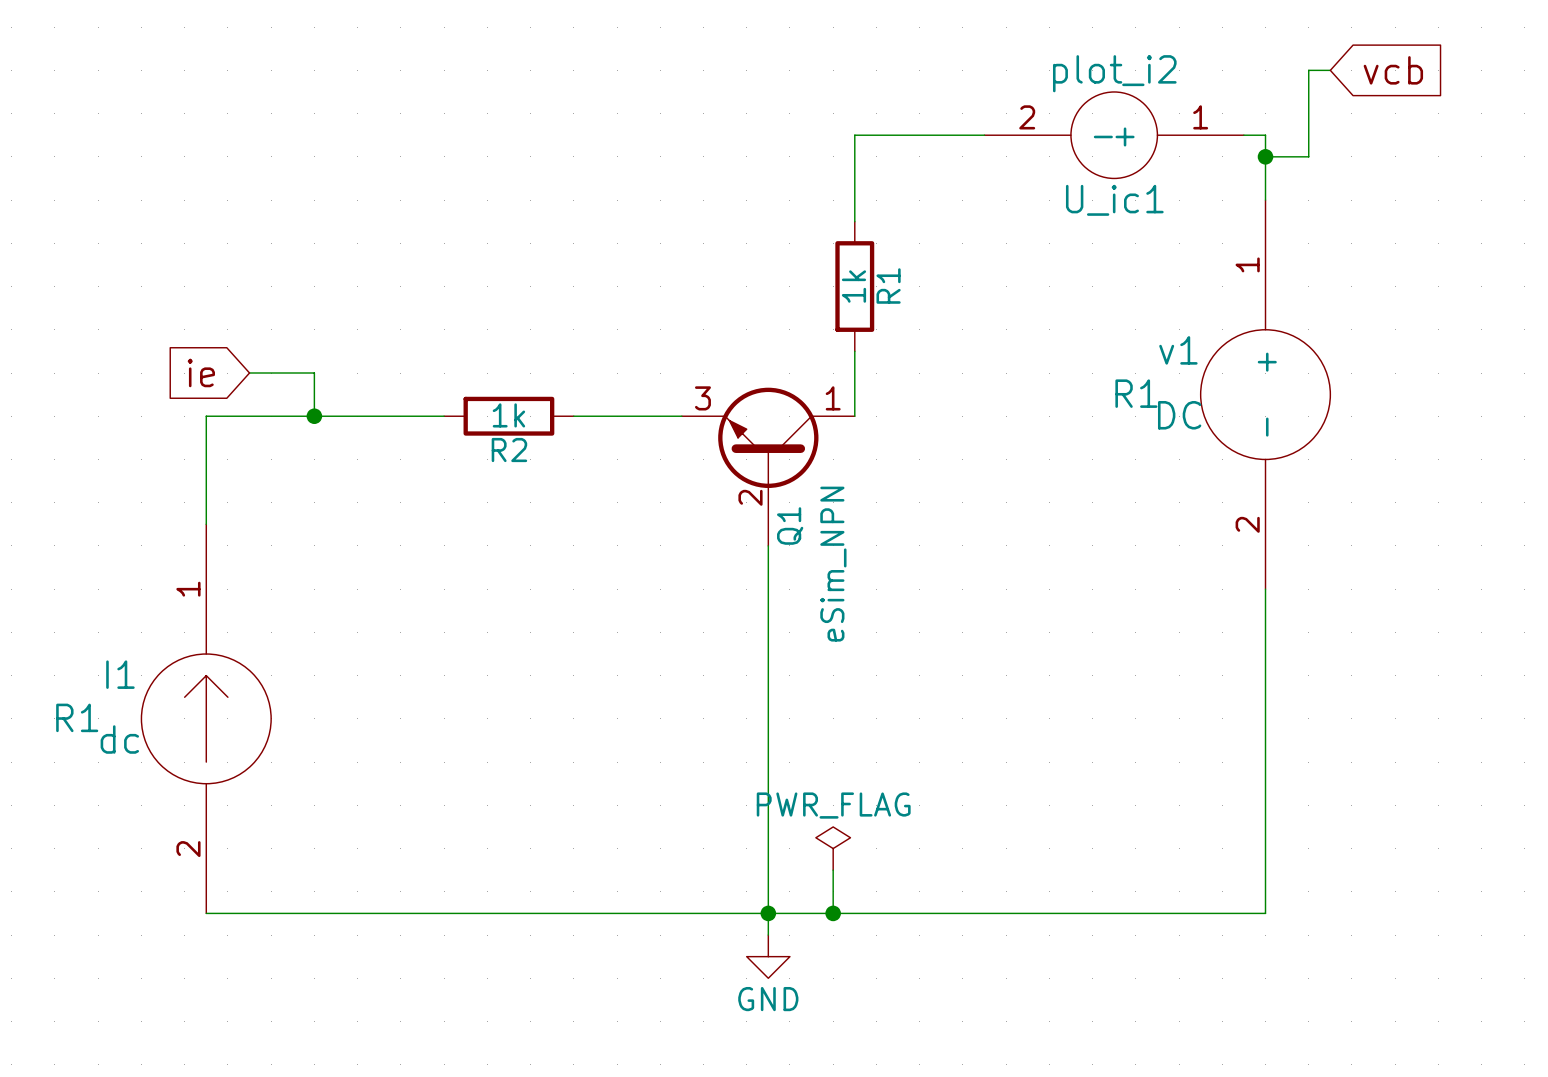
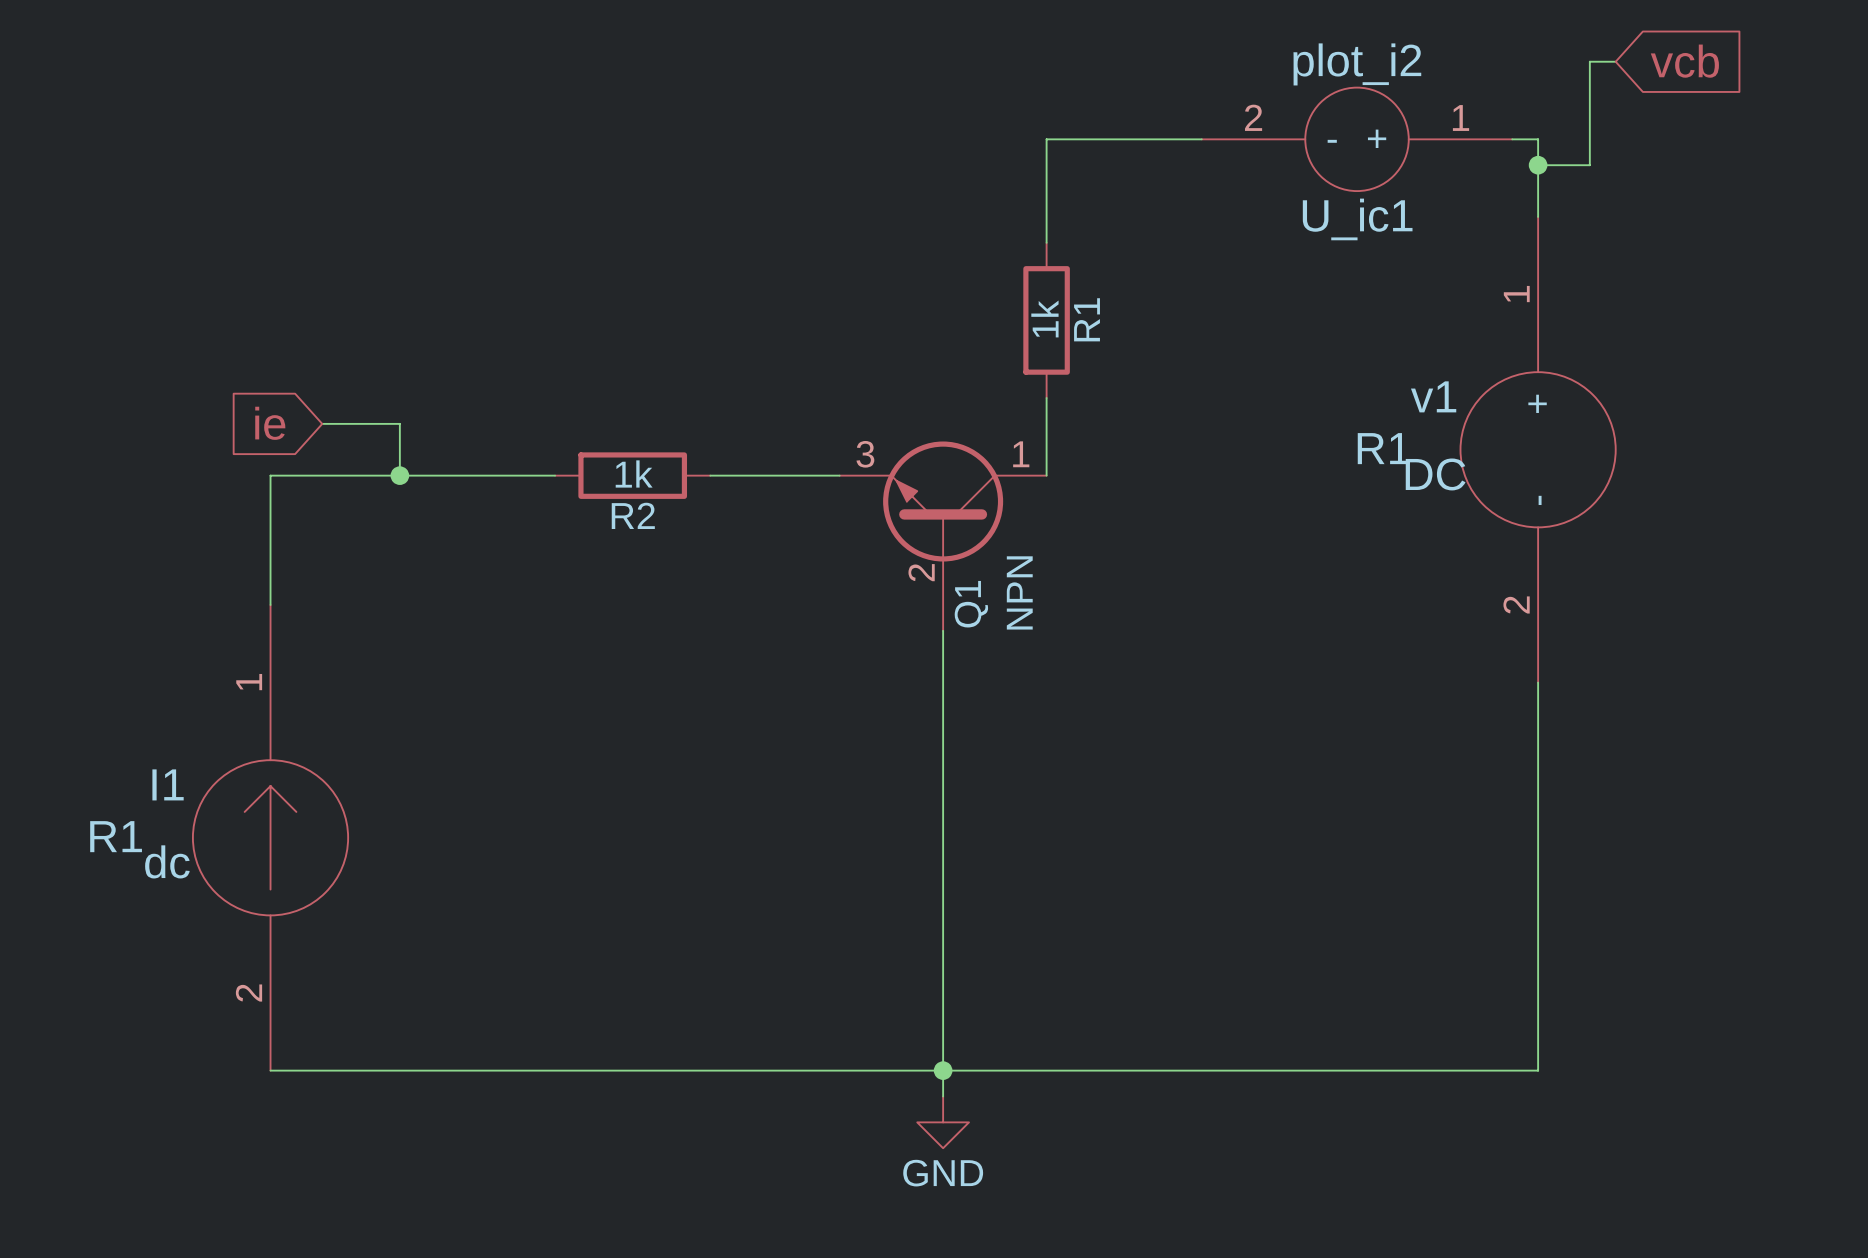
Q1 value: eSim_NPN (833, 564) -> NPN (1019, 592)
power symbol: PWR_FLAG (833, 848) -> none
wire: (833, 870) (833, 913) -> none
junction: (833, 913) -> none

